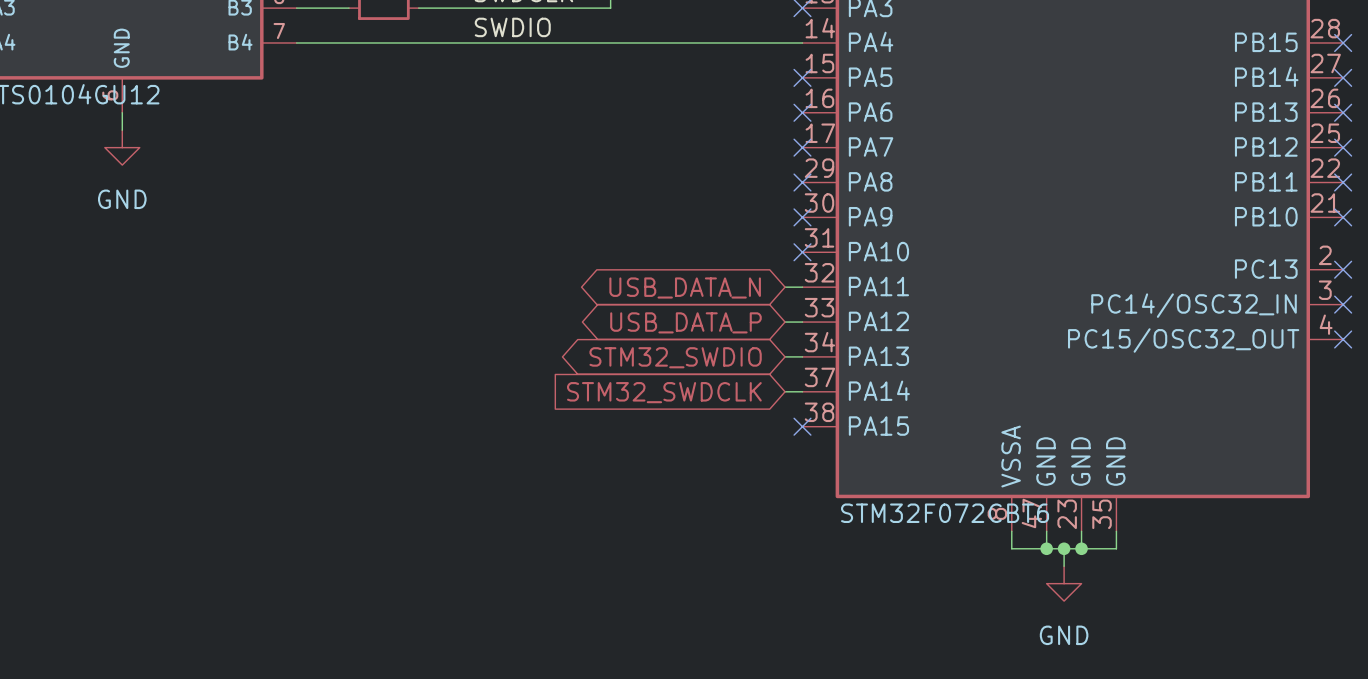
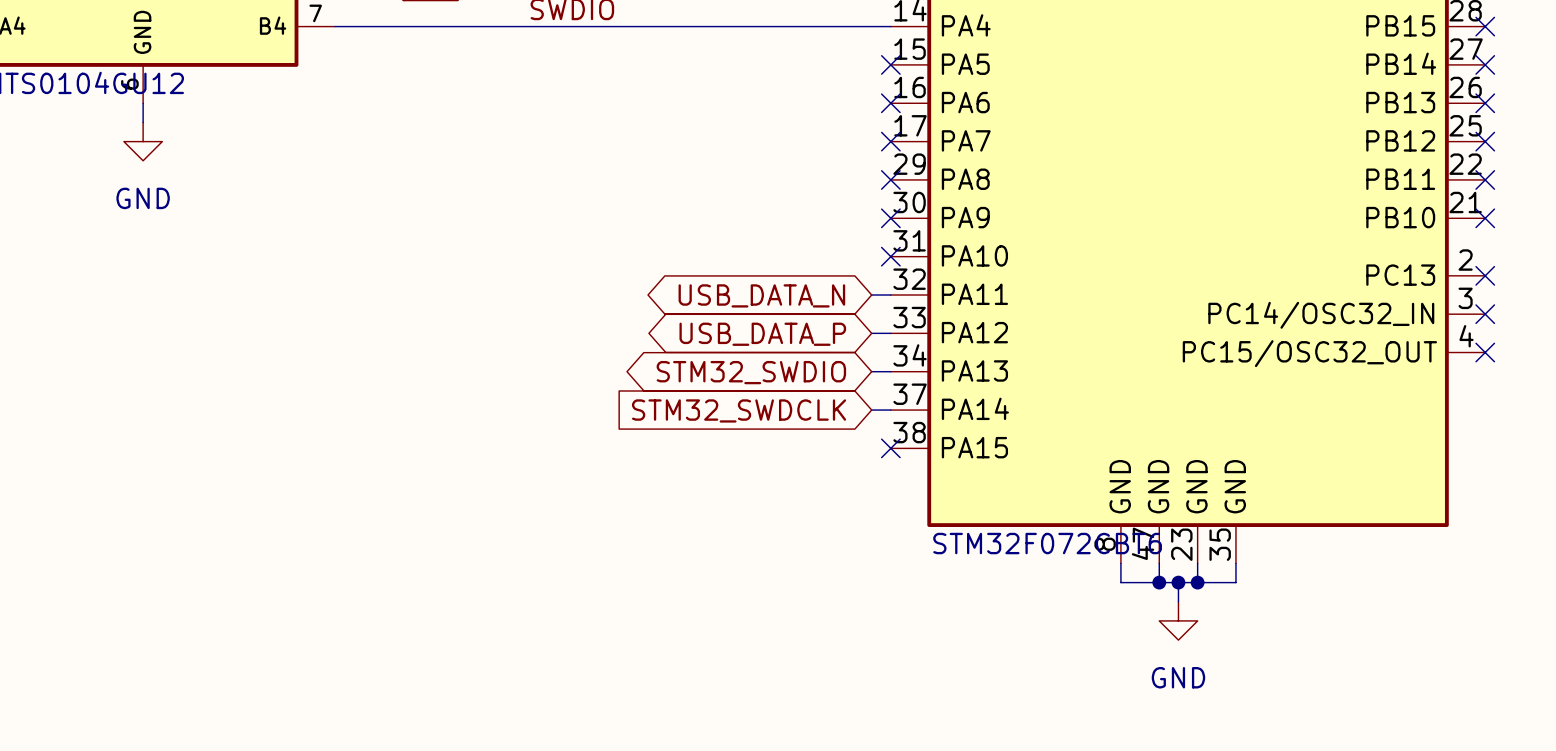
part pin name: VSSA (1011, 456) -> GND (1120, 486)

